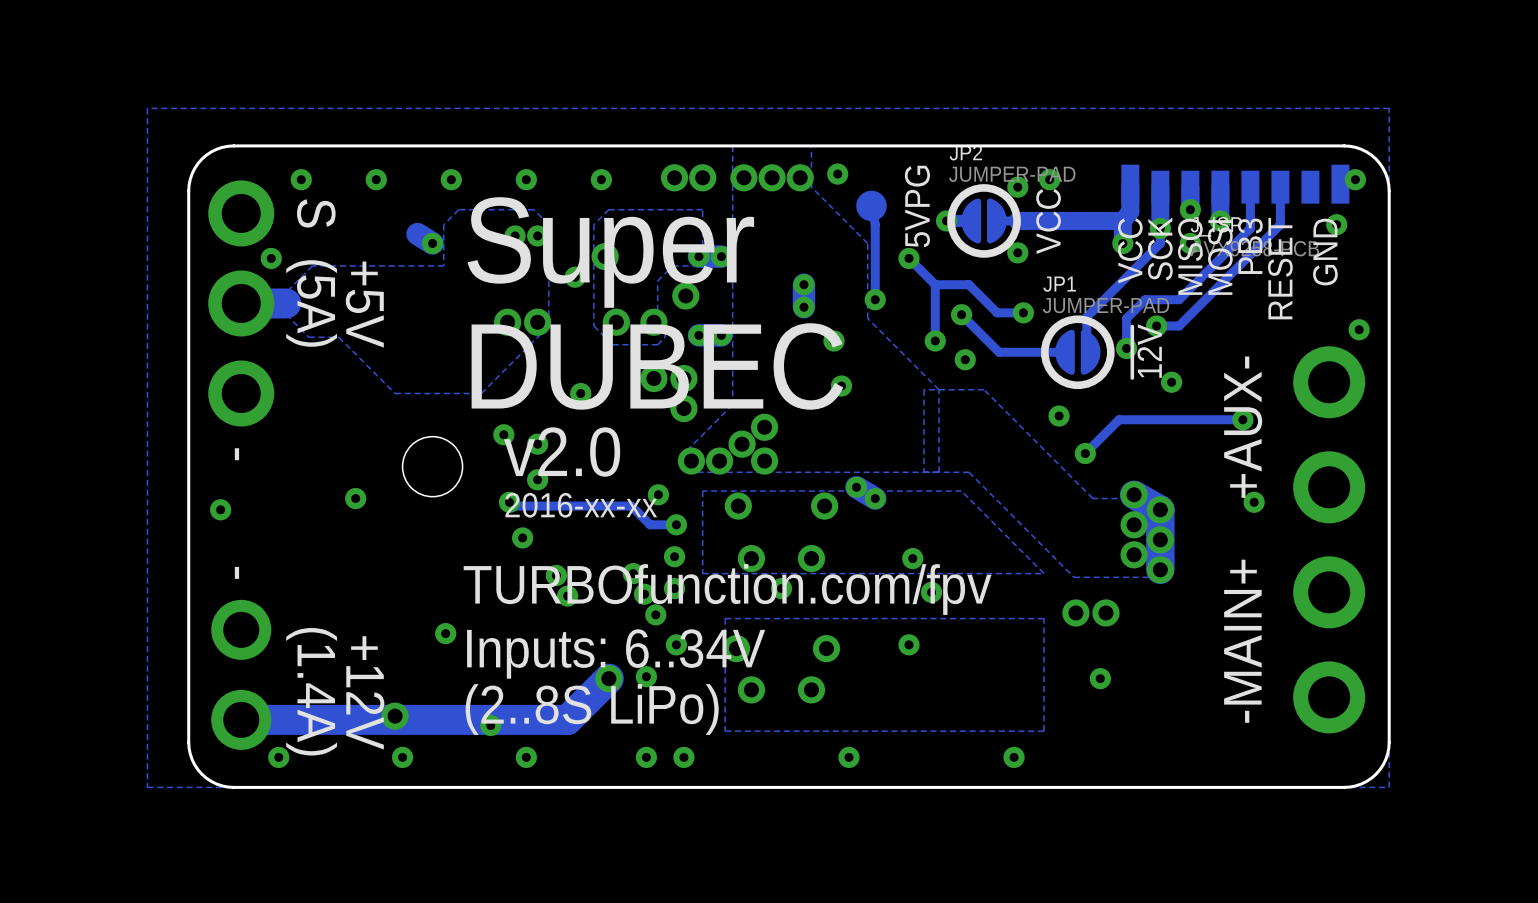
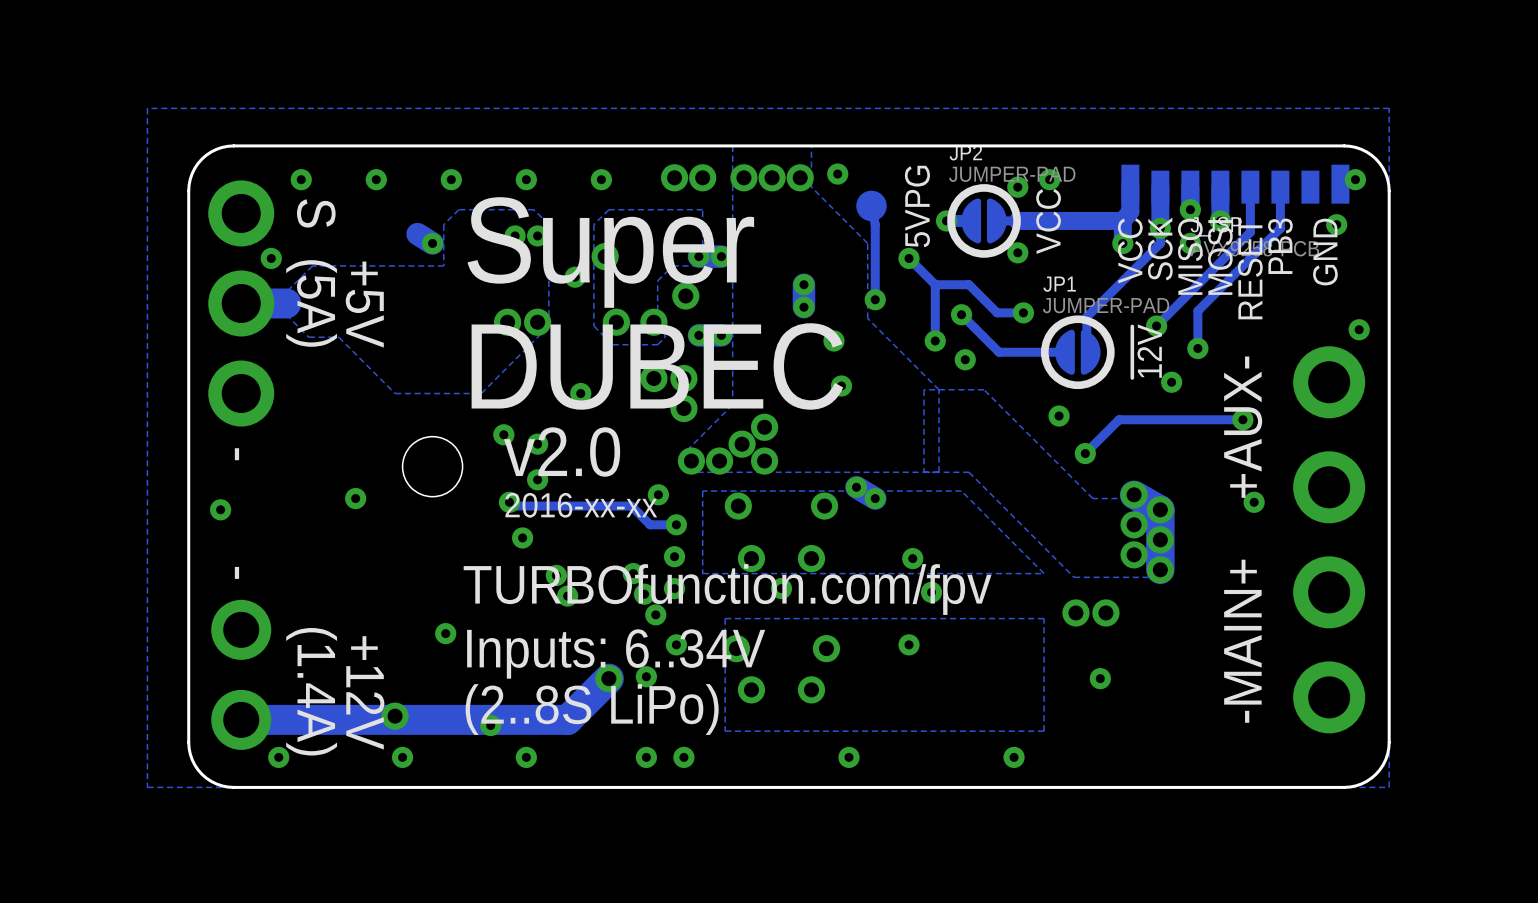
track: (1280, 224) (1179, 325) (1156, 325) -> (1250, 228) (1250, 232) (1156, 325)
track: none -> (1280, 224) (1280, 228) (1197, 310) (1197, 348)
track: (1250, 228) (1179, 299) (1145, 299) (1126, 318) (1126, 348) -> none
text: PB3 (1250, 246) -> RESET (1250, 268)
text: RESET (1280, 268) -> PB3 (1280, 246)
via position: (1126, 348) -> (1197, 348)

